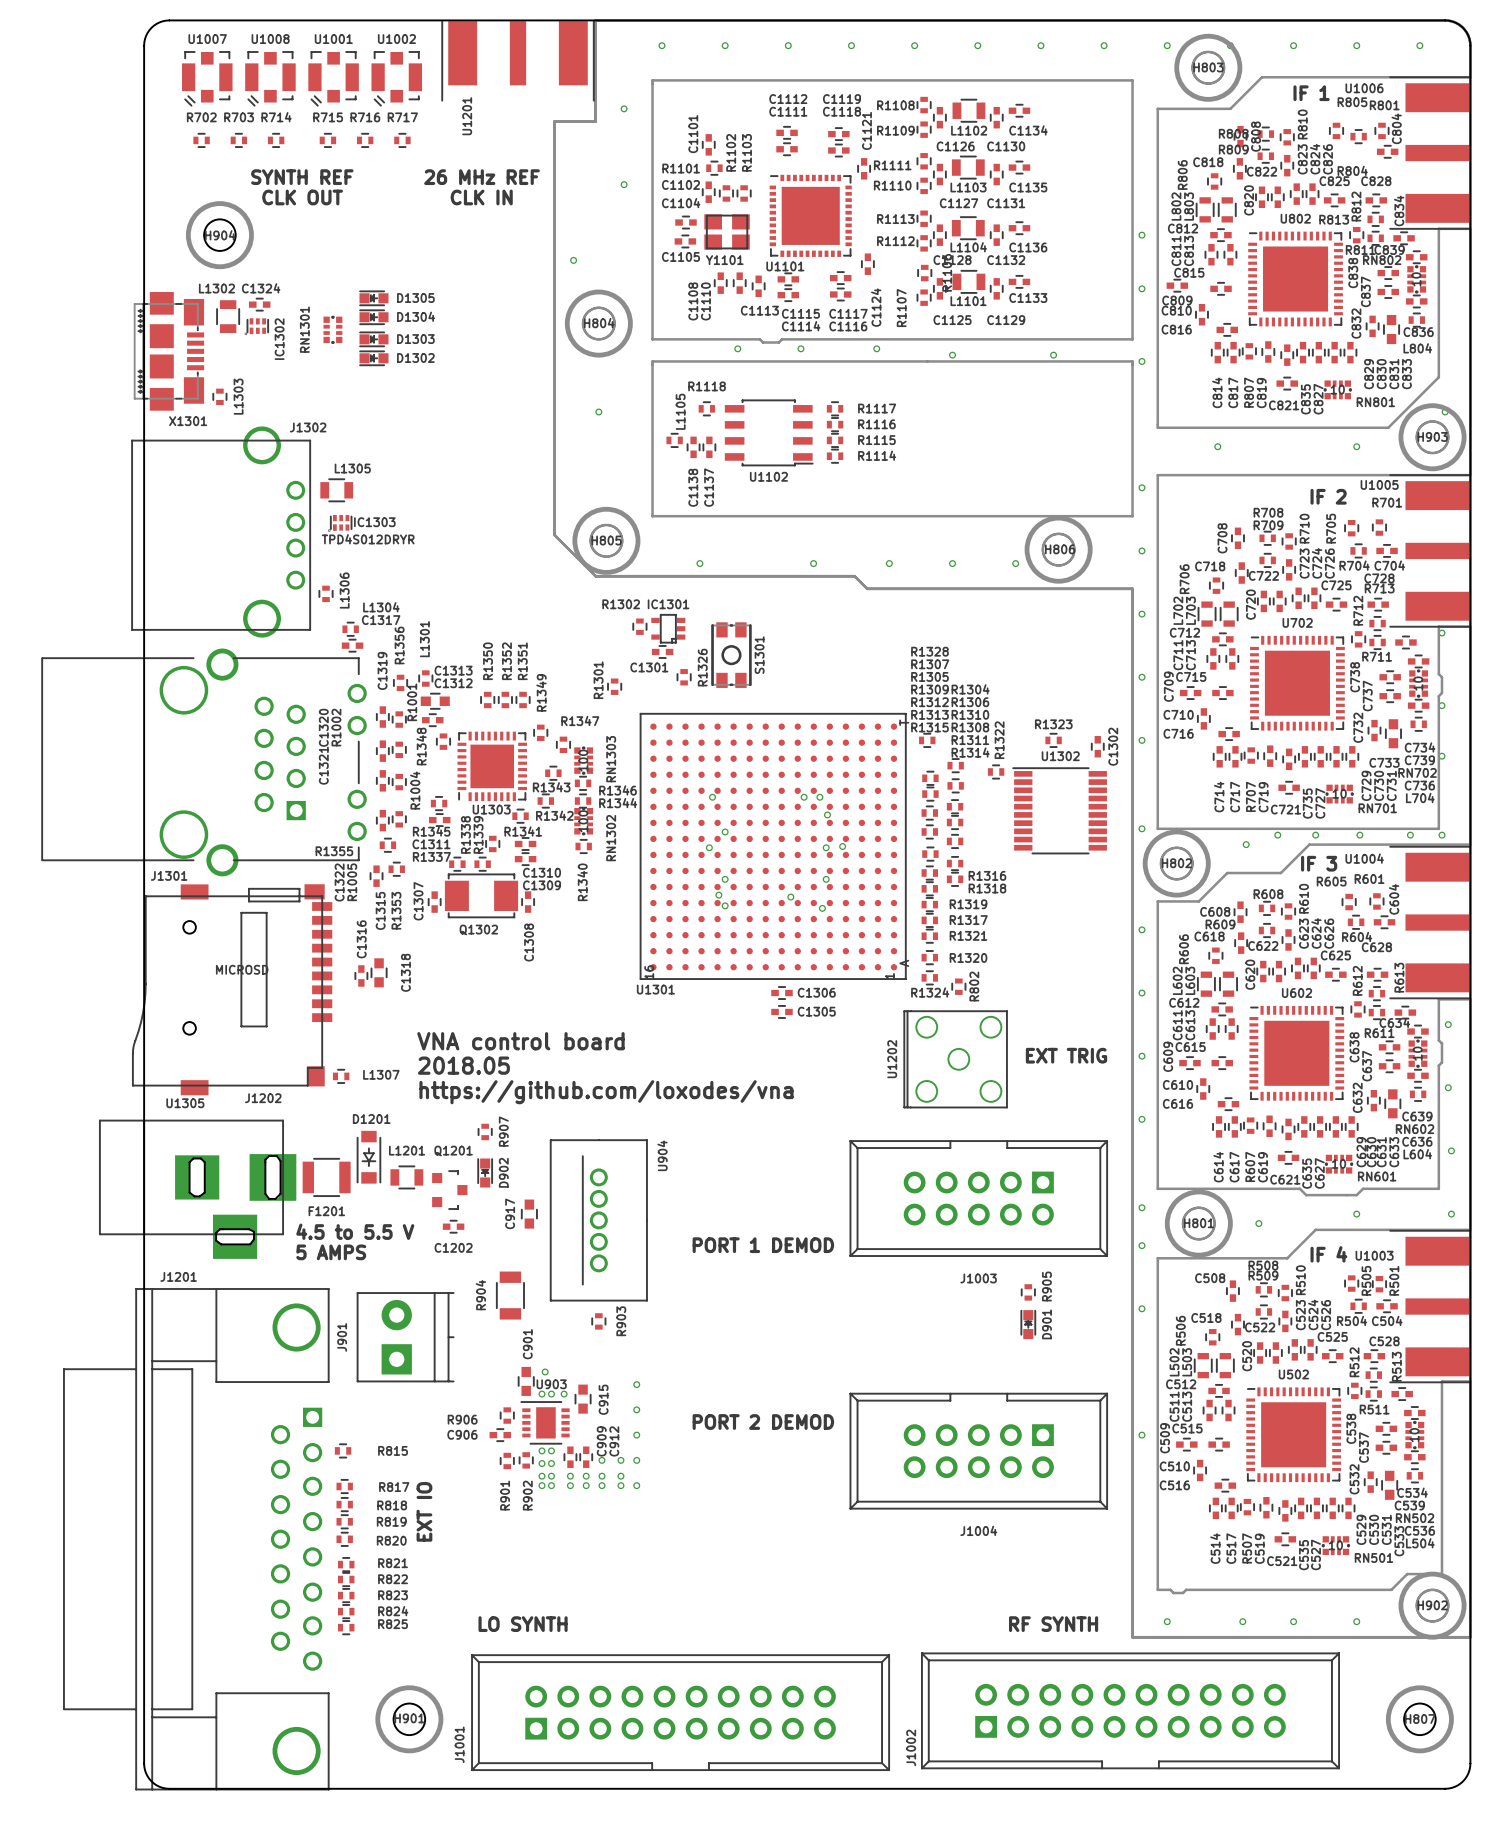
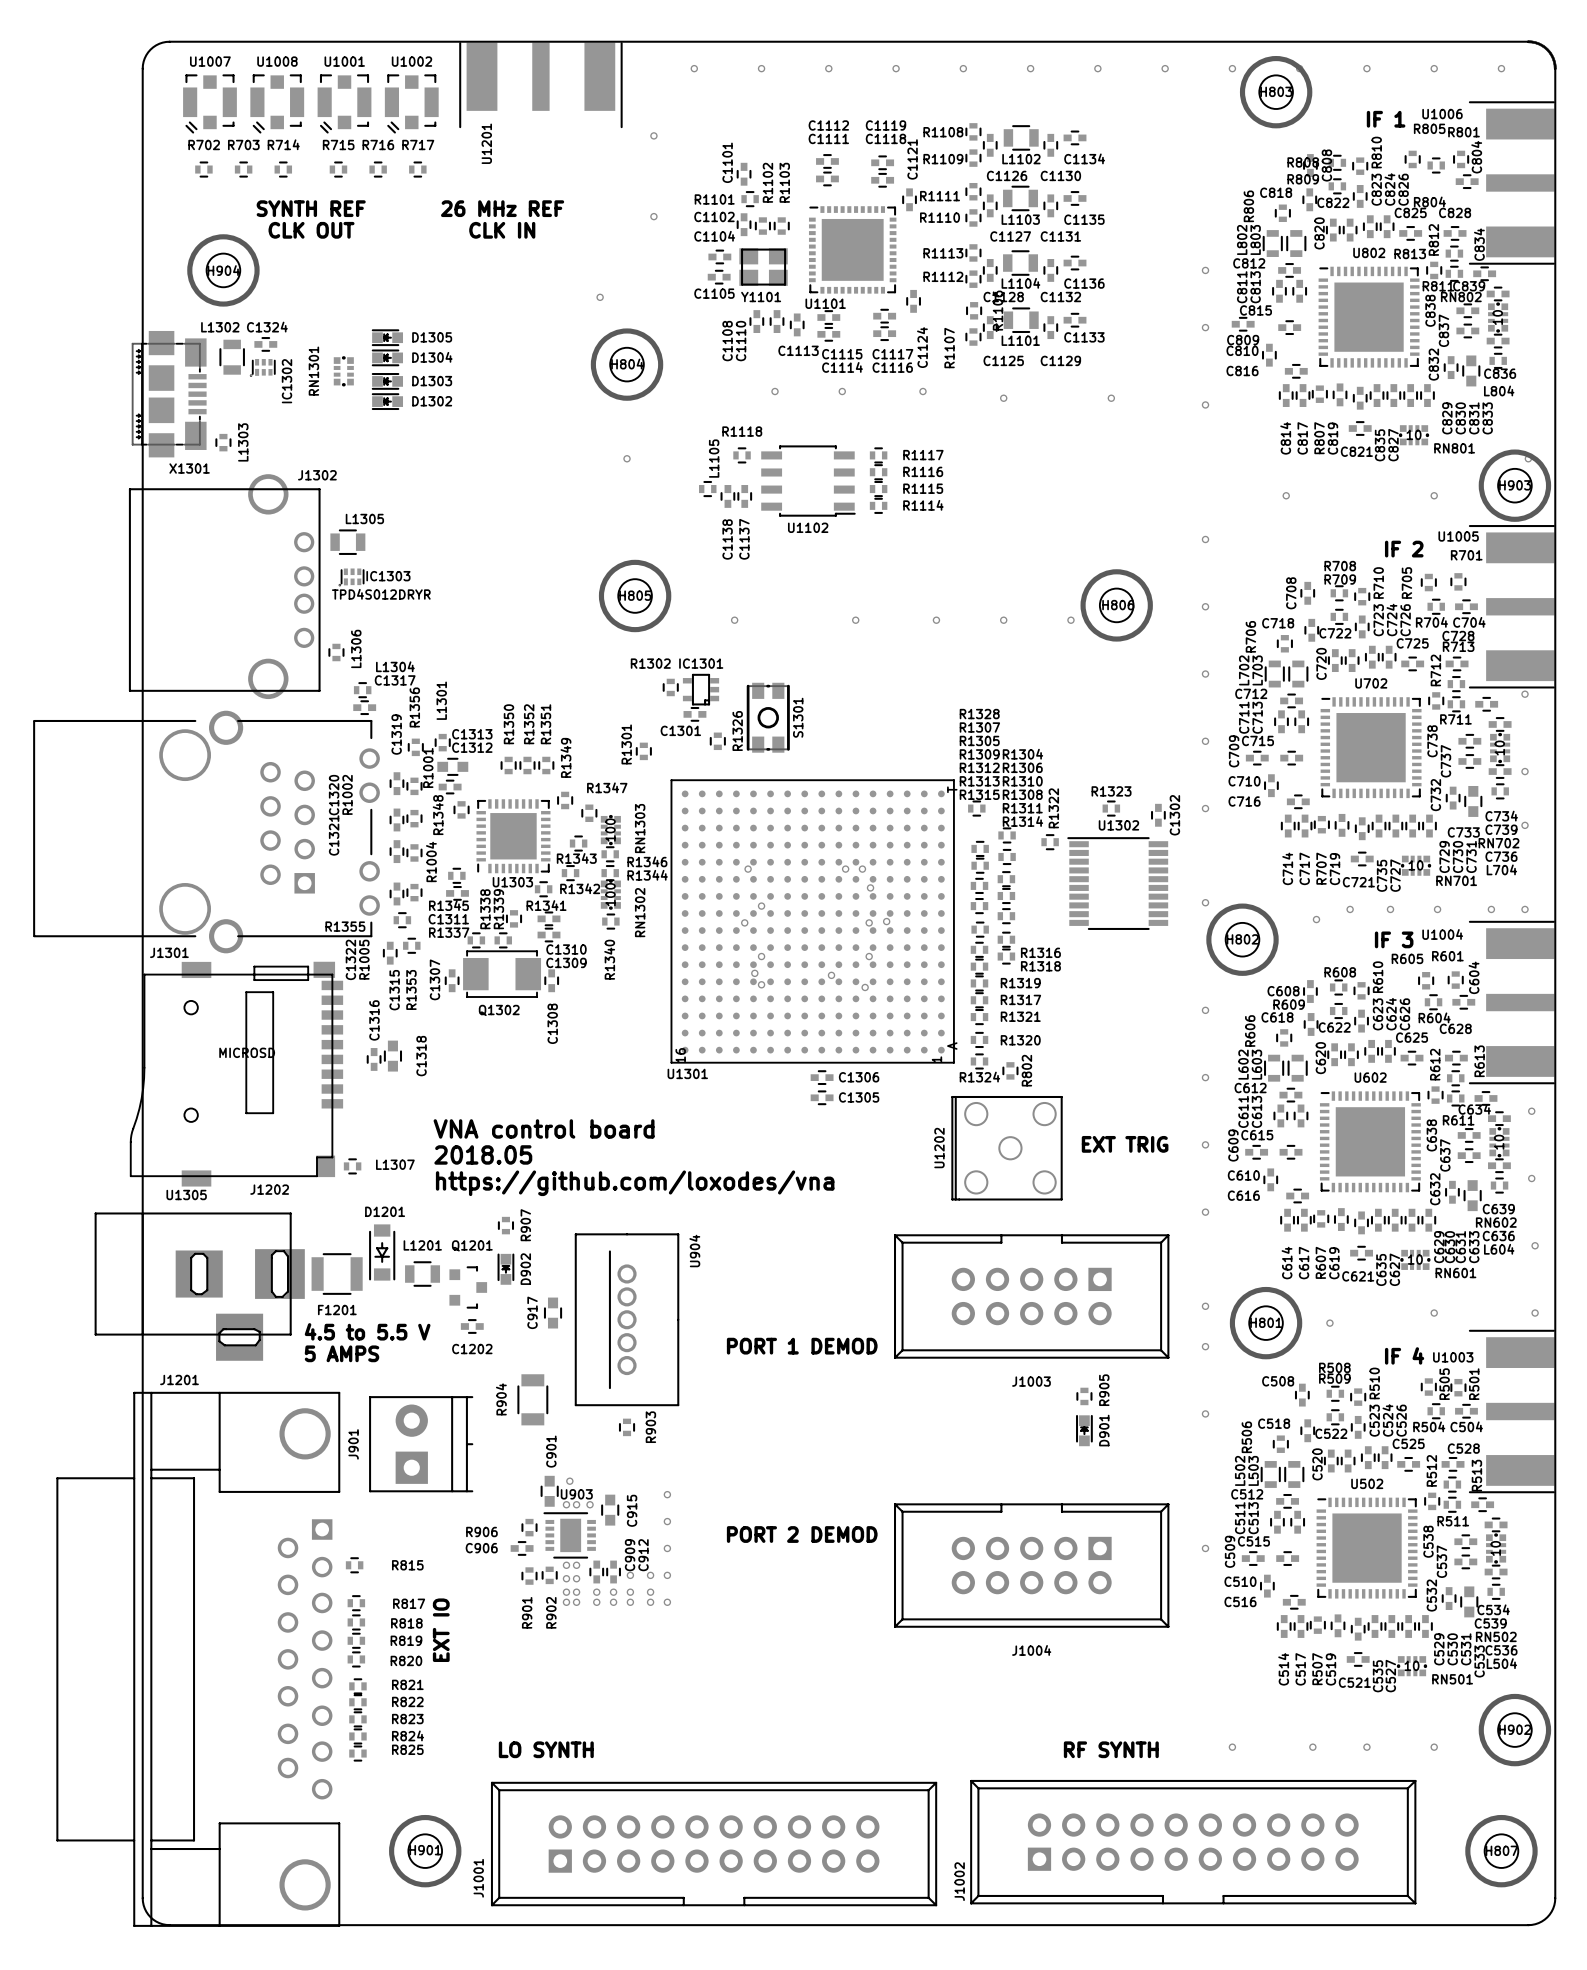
line: (1445, 20) (595, 20) (595, 121) (554, 121) (554, 535) (595, 576) (854, 576) (867, 588) (1132, 588) (1132, 1637) (1470, 1637) (1470, 45) -> none
drawing: [1191, 50, 1226, 85] -> none
line: (1470, 77) (1261, 77) (1230, 108) (1157, 108) (1157, 427) (1388, 427) (1438, 377) (1438, 228) (1470, 228) -> none
line: (652, 80) (1132, 80) (1132, 339) (782, 339) (778, 342) (763, 342) (759, 339) (652, 339) (652, 80) -> none
drawing: [581, 306, 616, 341] -> none
line: (652, 361) (652, 516) (1132, 516) (1132, 361) (652, 361) -> none
drawing: [1415, 420, 1450, 455] -> none
line: (1470, 475) (1157, 475) (1157, 828) (1438, 828) (1438, 696) (1441, 693) (1441, 677) (1438, 674) (1438, 626) (1470, 626) -> none
drawing: [589, 523, 624, 558] -> none
drawing: [1041, 532, 1076, 567] -> none
line: (1470, 844) (1309, 844) (1280, 873) (1227, 873) (1198, 901) (1157, 901) (1157, 1188) (1299, 1188) (1306, 1195) (1356, 1195) (1363, 1188) (1438, 1188) (1438, 1065) (1441, 1062) (1441, 1043) (1438, 1040) (1438, 999) (1470, 999) -> none
drawing: [1159, 846, 1194, 881] -> none
drawing: [1181, 1206, 1216, 1241] -> none
line: (1470, 1229) (1315, 1229) (1287, 1258) (1157, 1258) (1157, 1589) (1170, 1589) (1173, 1593) (1183, 1593) (1186, 1589) (1391, 1589) (1407, 1574) (1441, 1574) (1441, 1381) (1470, 1381) -> none
drawing: [1415, 1588, 1450, 1623] -> none

